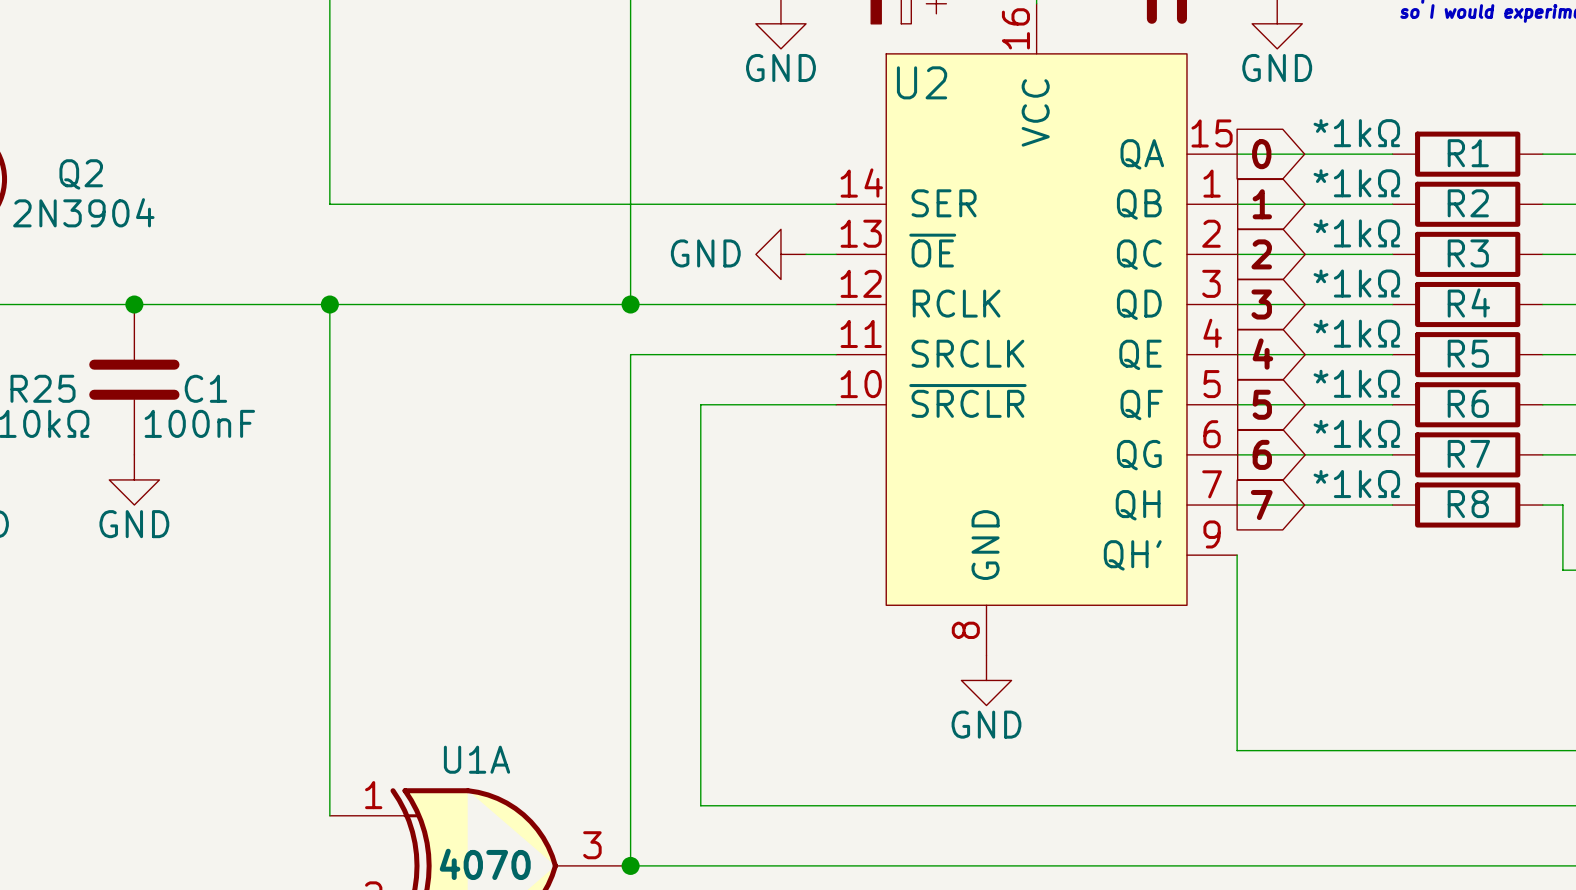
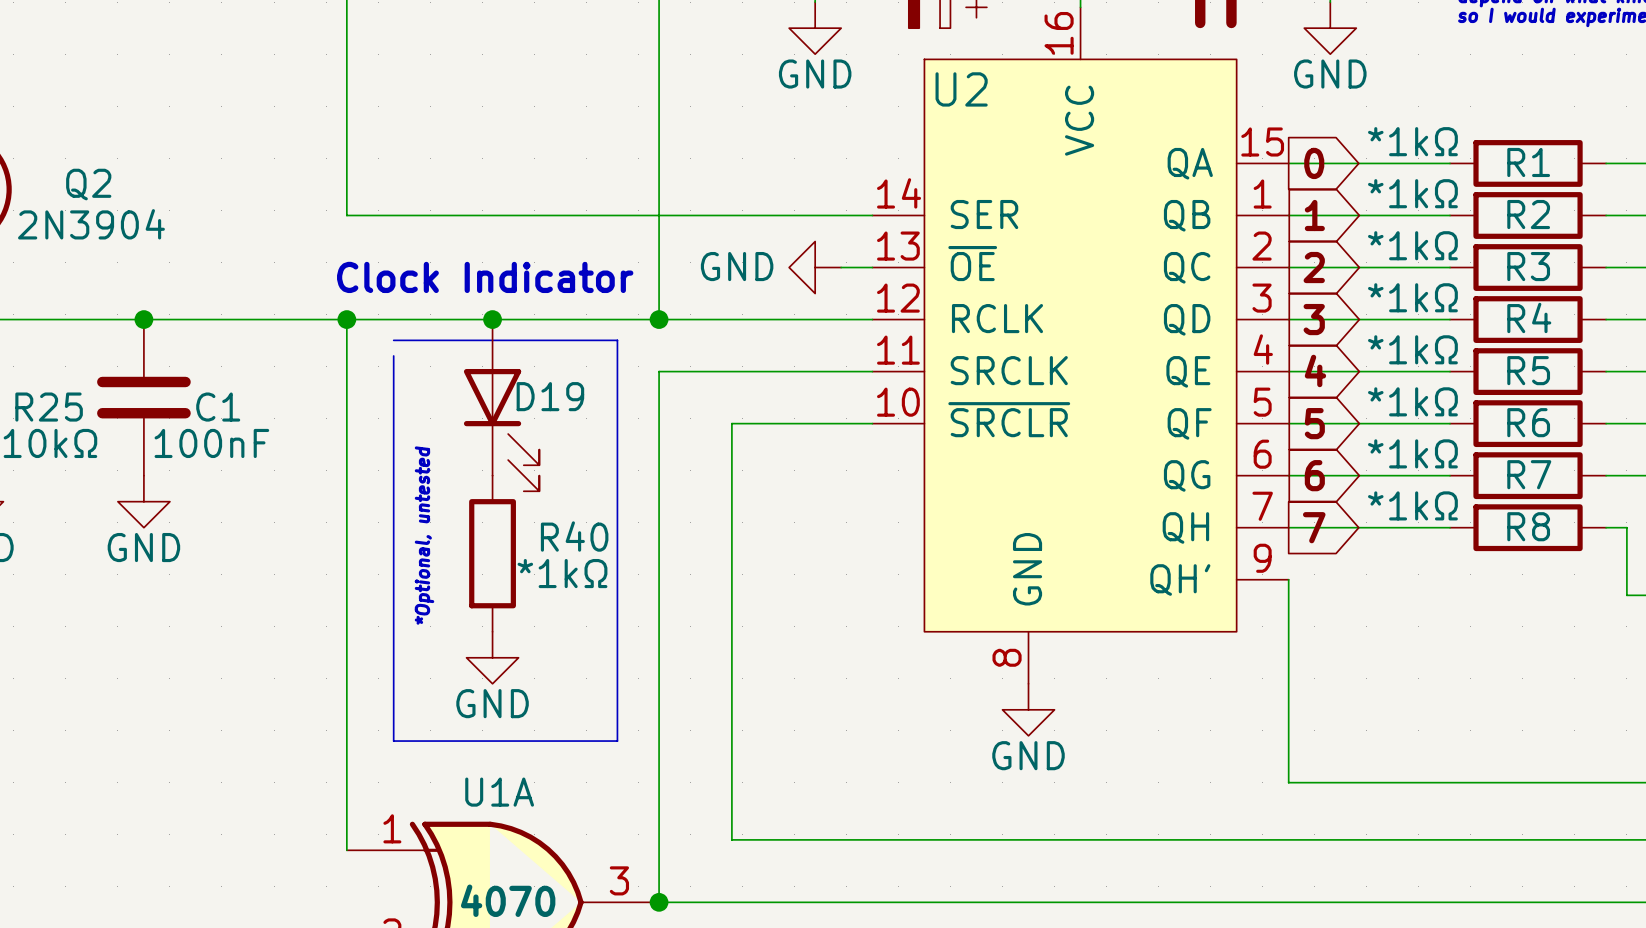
text: none -> Clock Indicator (485, 277)
junction: none -> (492, 319)
line: none -> (393, 340) (617, 340) (617, 741) (393, 741) (393, 355)
D19: none -> (501, 405)
text: none -> *Optional, untested (424, 535)
R40: none -> *1kΩ (492, 553)
power symbol: none -> GND (492, 657)

